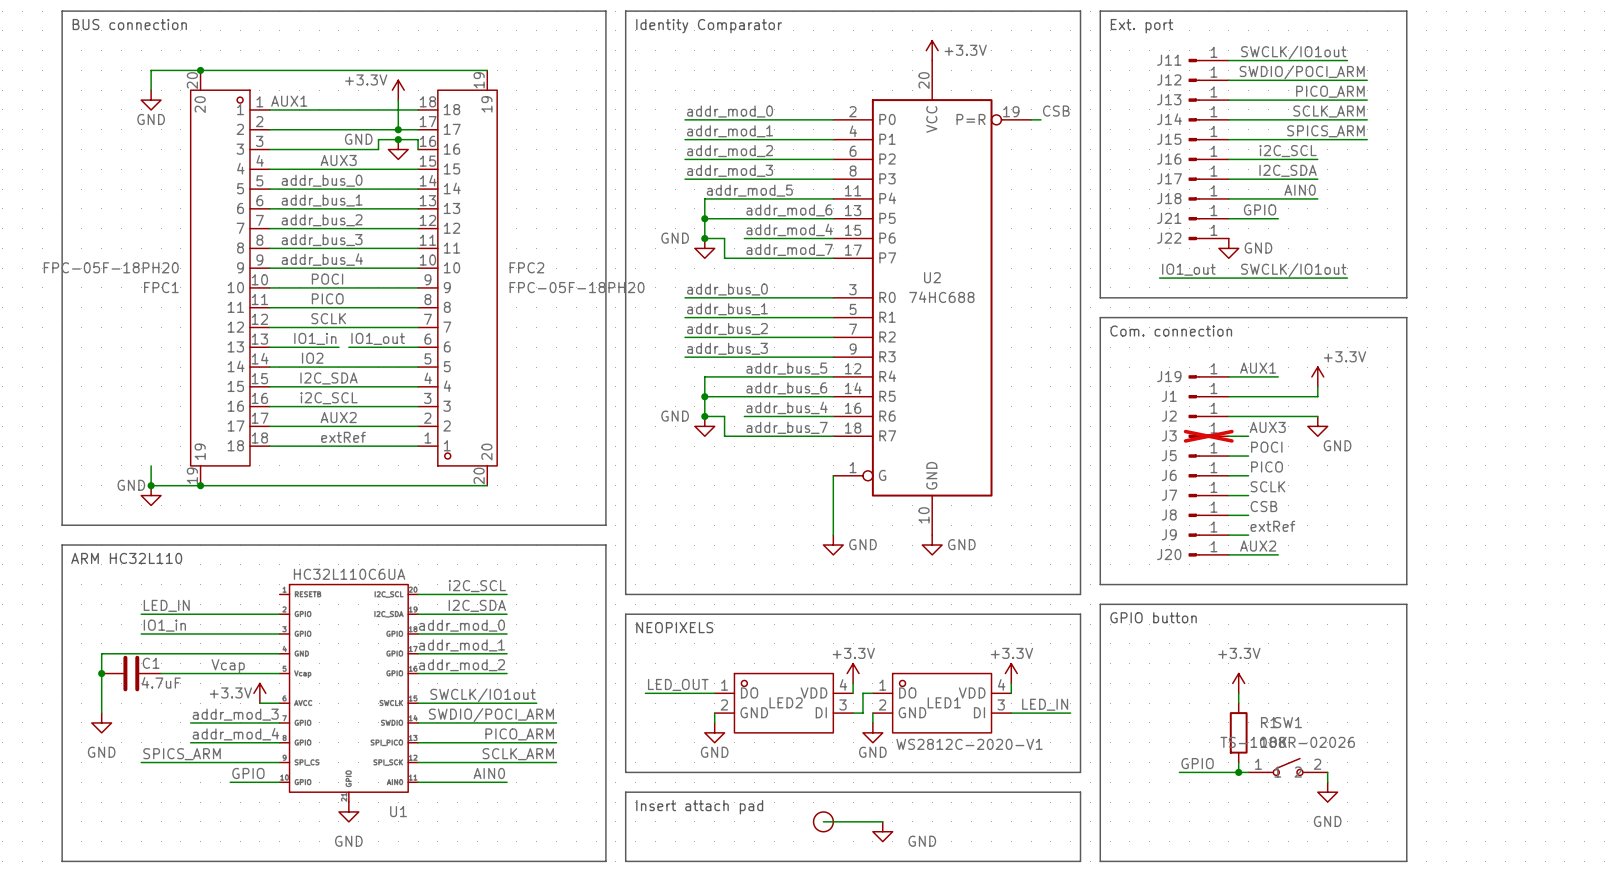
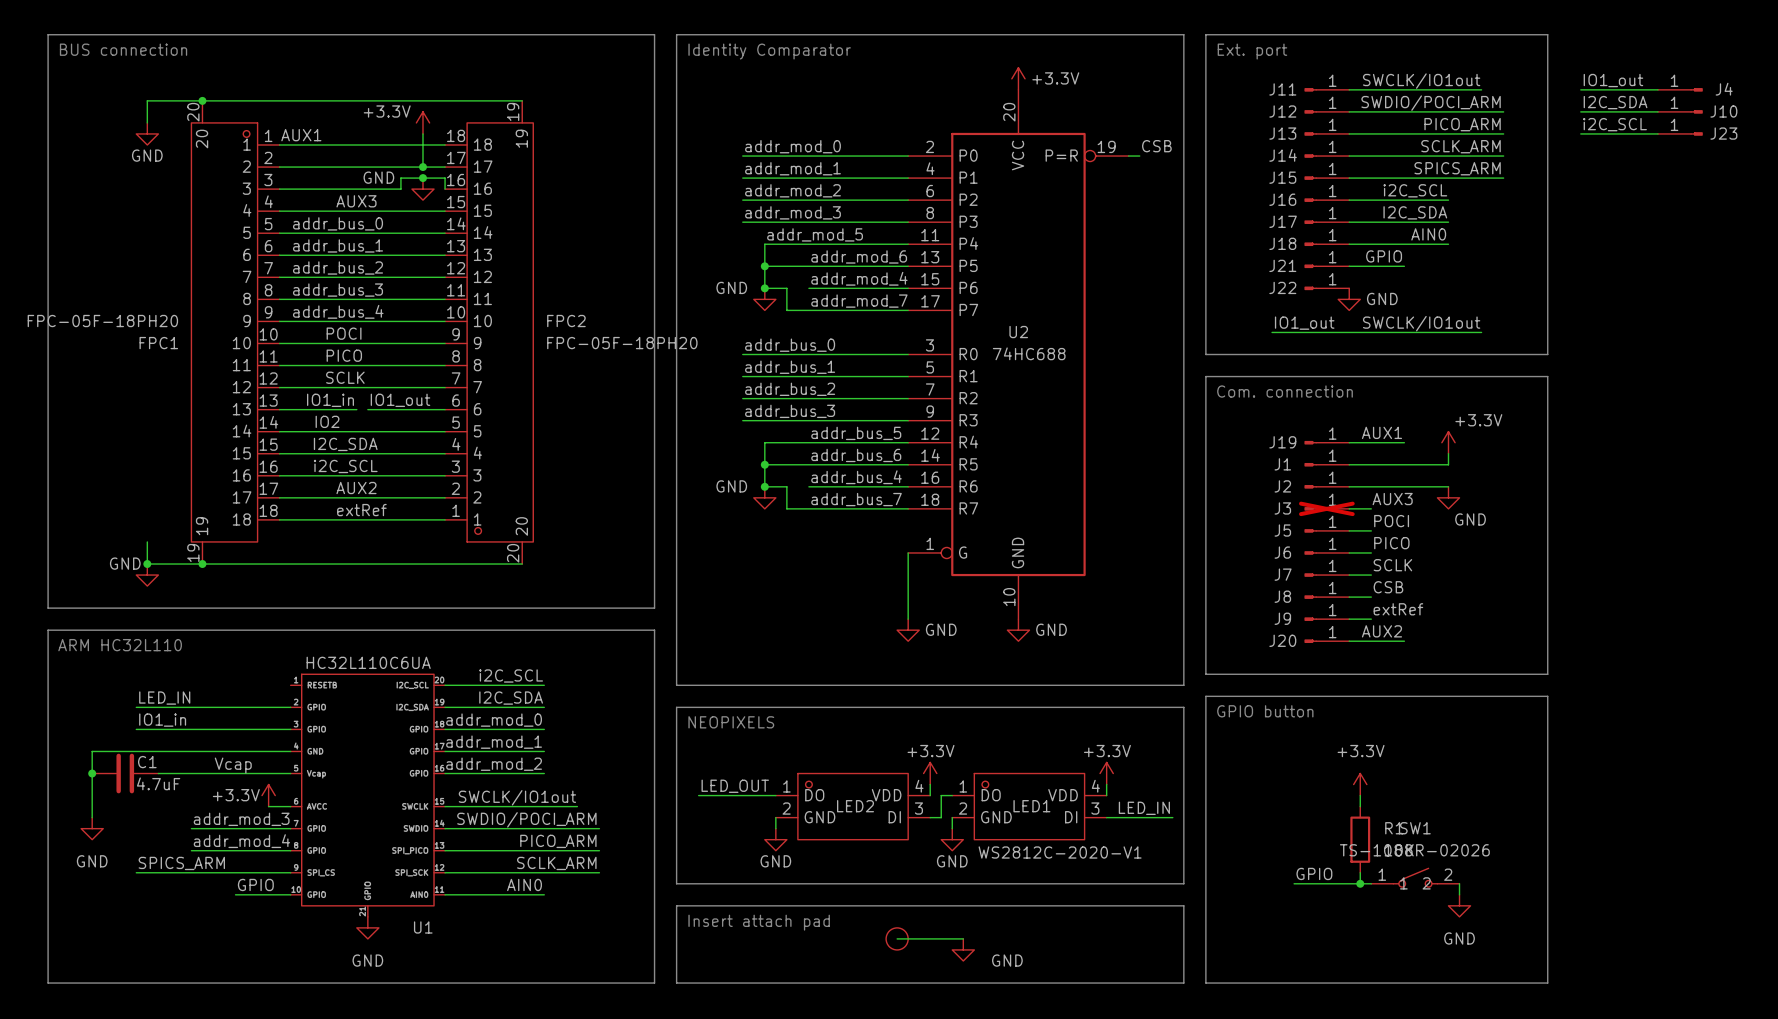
label: none -> IO1_out (1613, 80)
wire: none -> (1580, 89) (1657, 89)
J4: none -> (1680, 89)
label: none -> I2C_SDA (1615, 102)
wire: none -> (1580, 111) (1657, 111)
J10: none -> (1680, 111)
label: none -> i2C_SCL (1615, 124)
wire: none -> (1580, 133) (1657, 133)
J23: none -> (1680, 133)

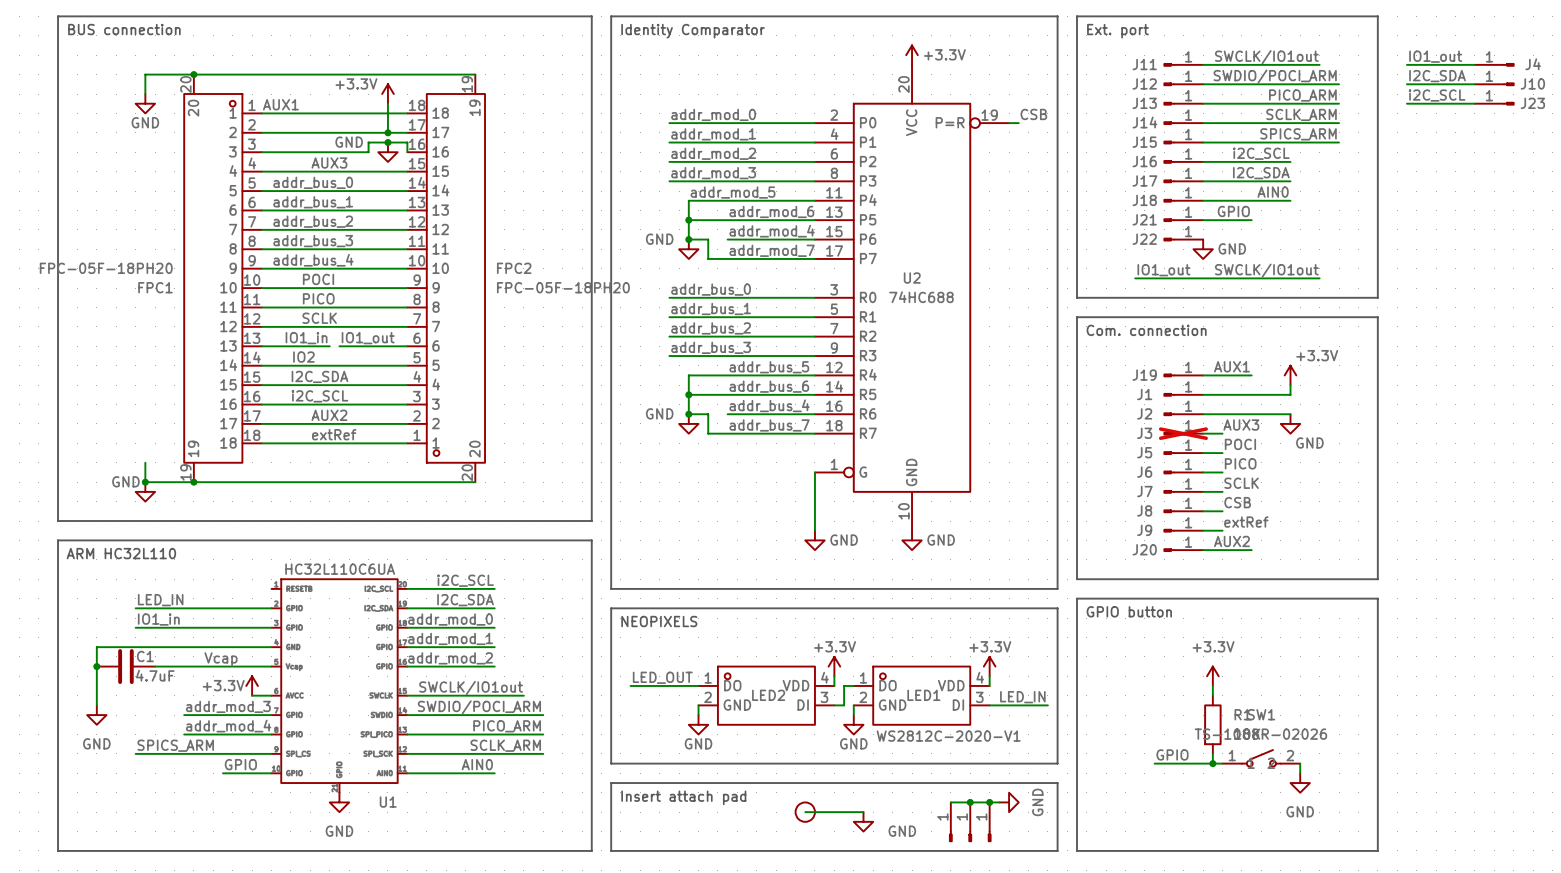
wire: none -> (950, 802) (999, 802)
junction: none -> (970, 802)
junction: none -> (989, 802)
power symbol: none -> GND (1009, 802)
part: none -> (950, 822)
part: none -> (970, 822)
part: none -> (989, 822)

